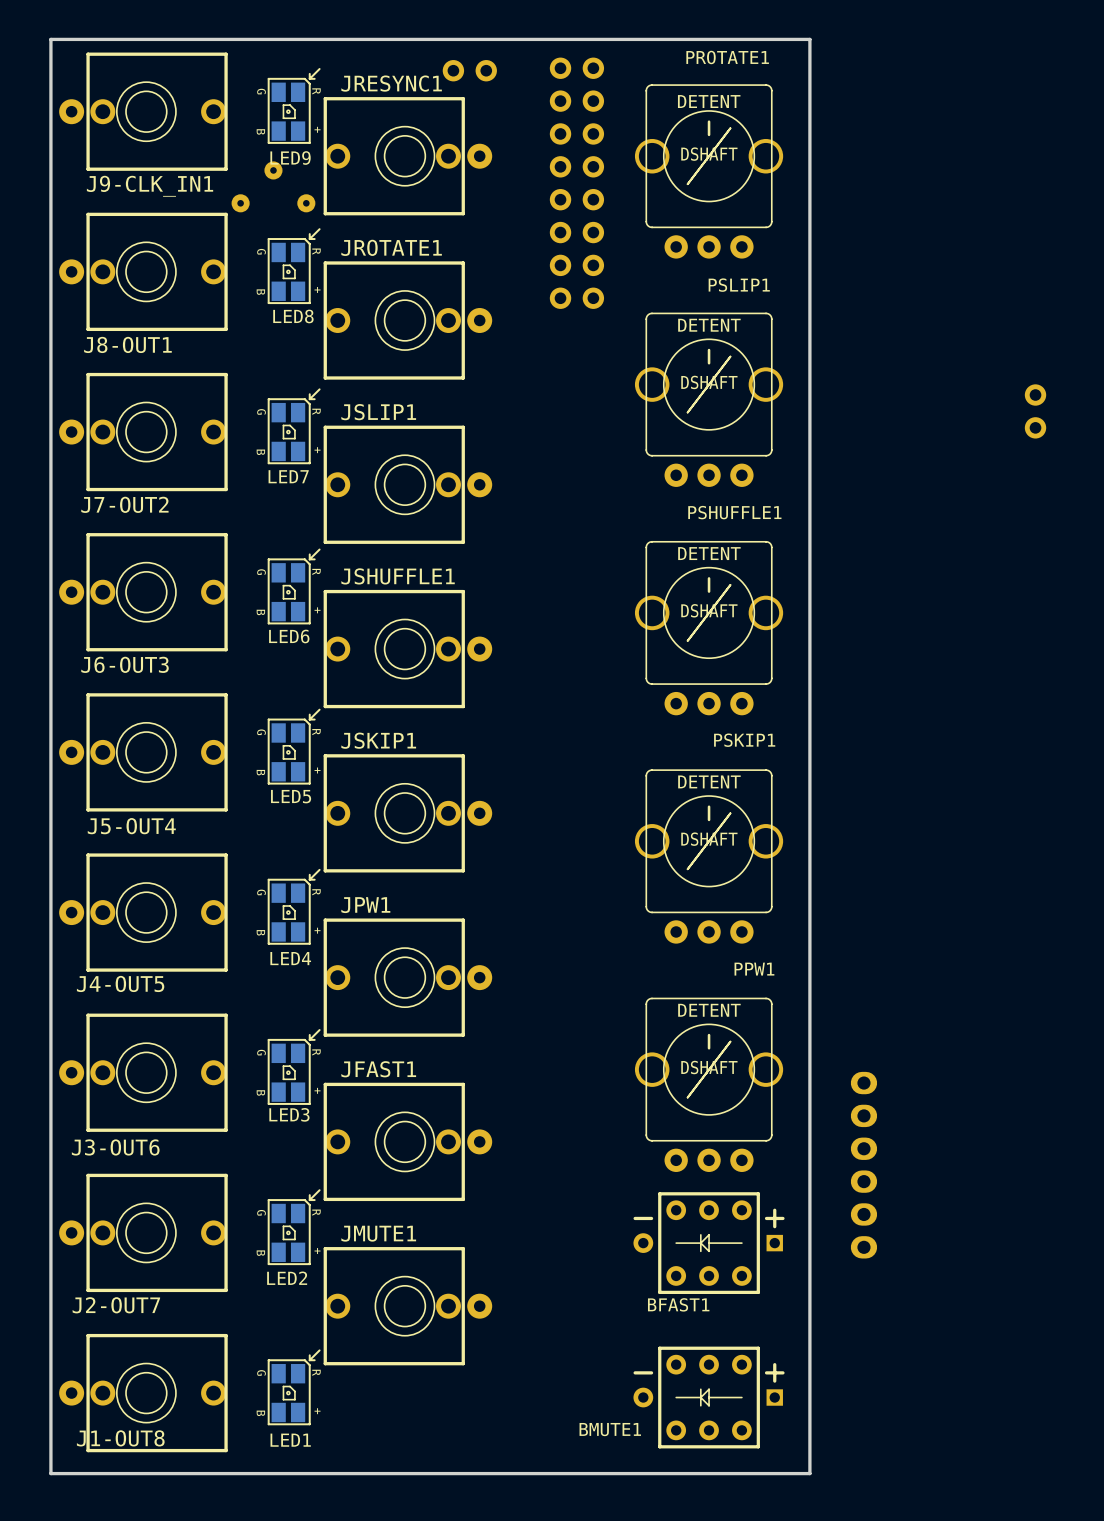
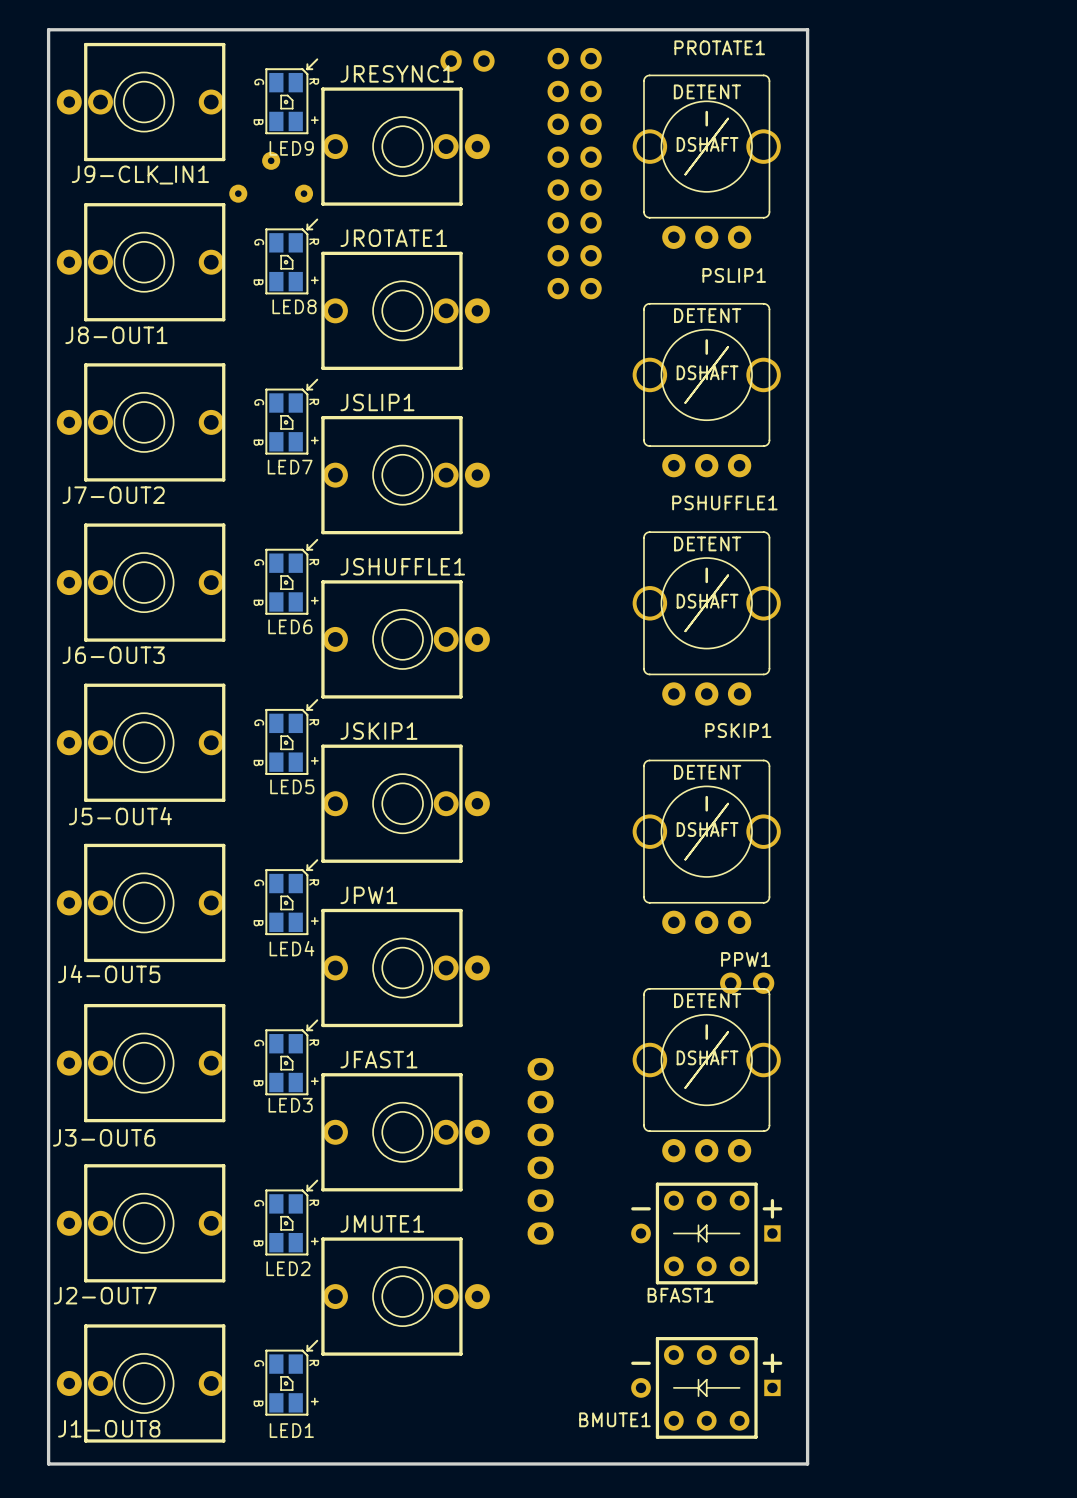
part: (1035, 411) -> none
part: none -> (747, 983)
part position: (863, 1165) -> (540, 1151)

